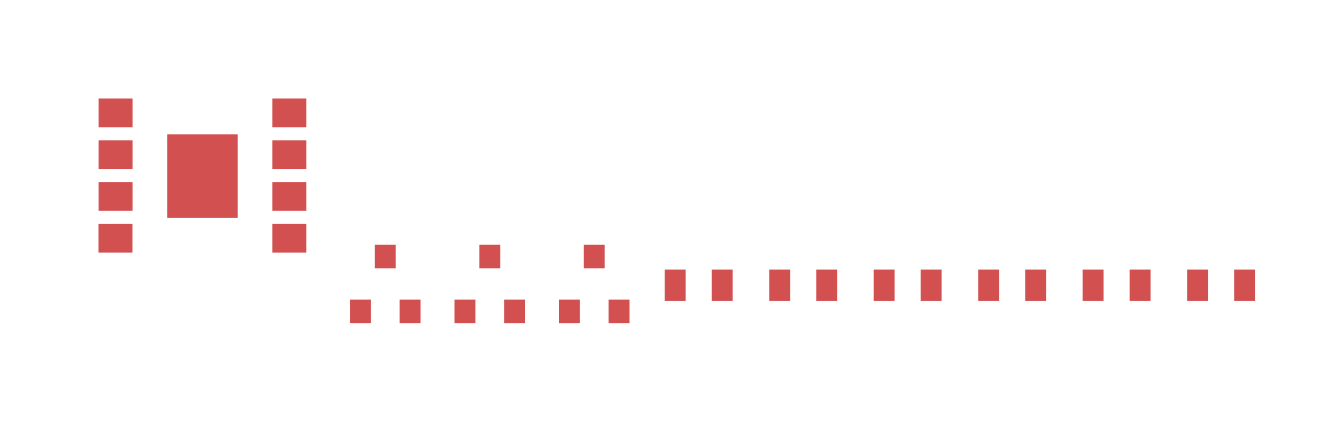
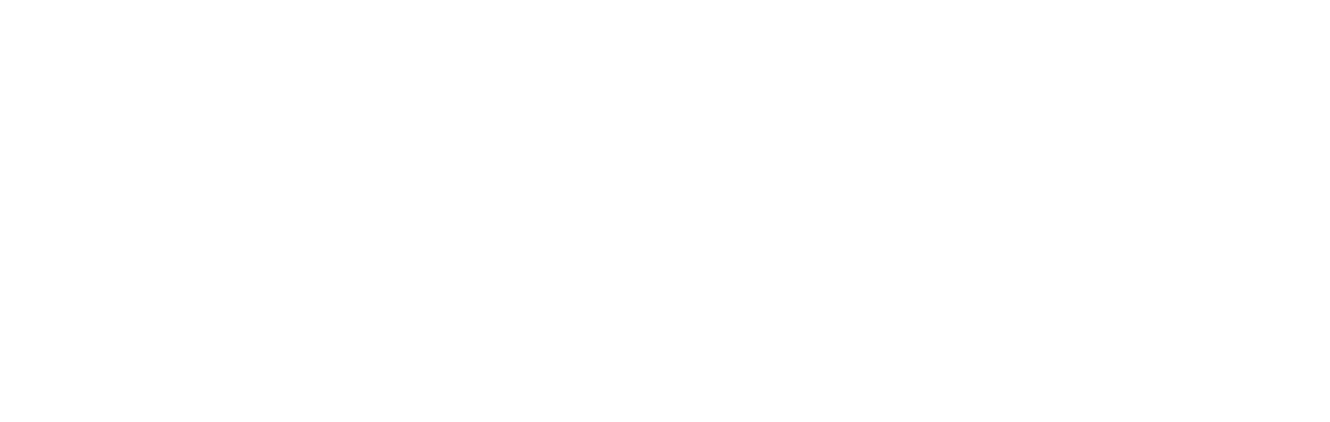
part: (202, 175) -> none
part: (385, 283) -> none
part: (489, 283) -> none
part: (594, 283) -> none
part: (698, 285) -> none
part: (803, 285) -> none
part: (907, 285) -> none
part: (1012, 285) -> none
part: (1116, 285) -> none
part: (1221, 285) -> none

